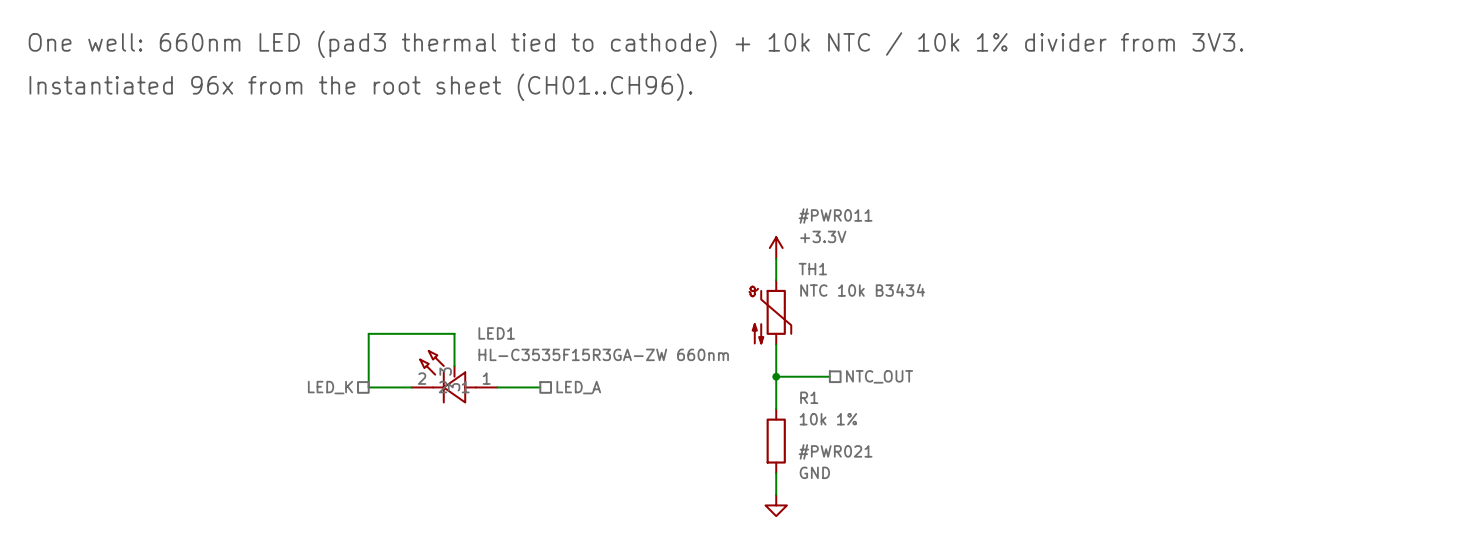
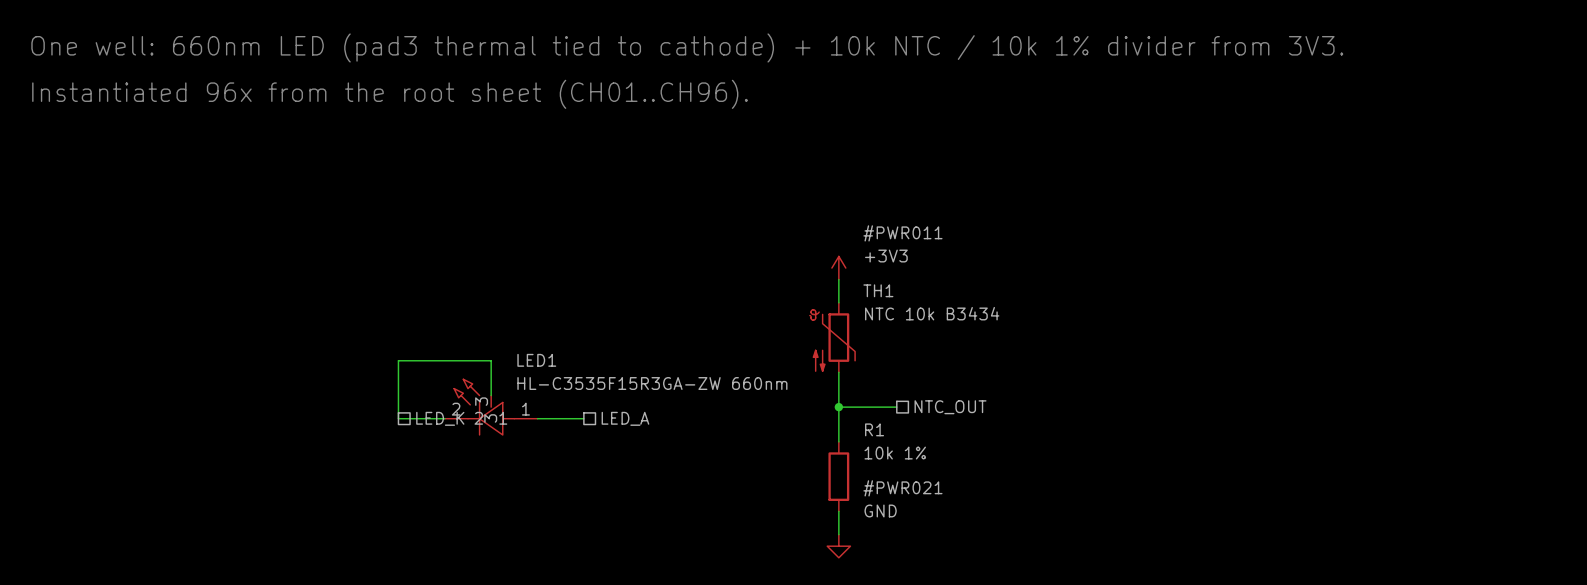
power symbol: +3.3V (776, 248) -> +3V3 (838, 268)
hierarchical label rotation: 0° (330, 387) -> 180° (440, 418)
hierarchical label position: LED_K (330, 387) -> LED_K (440, 418)

